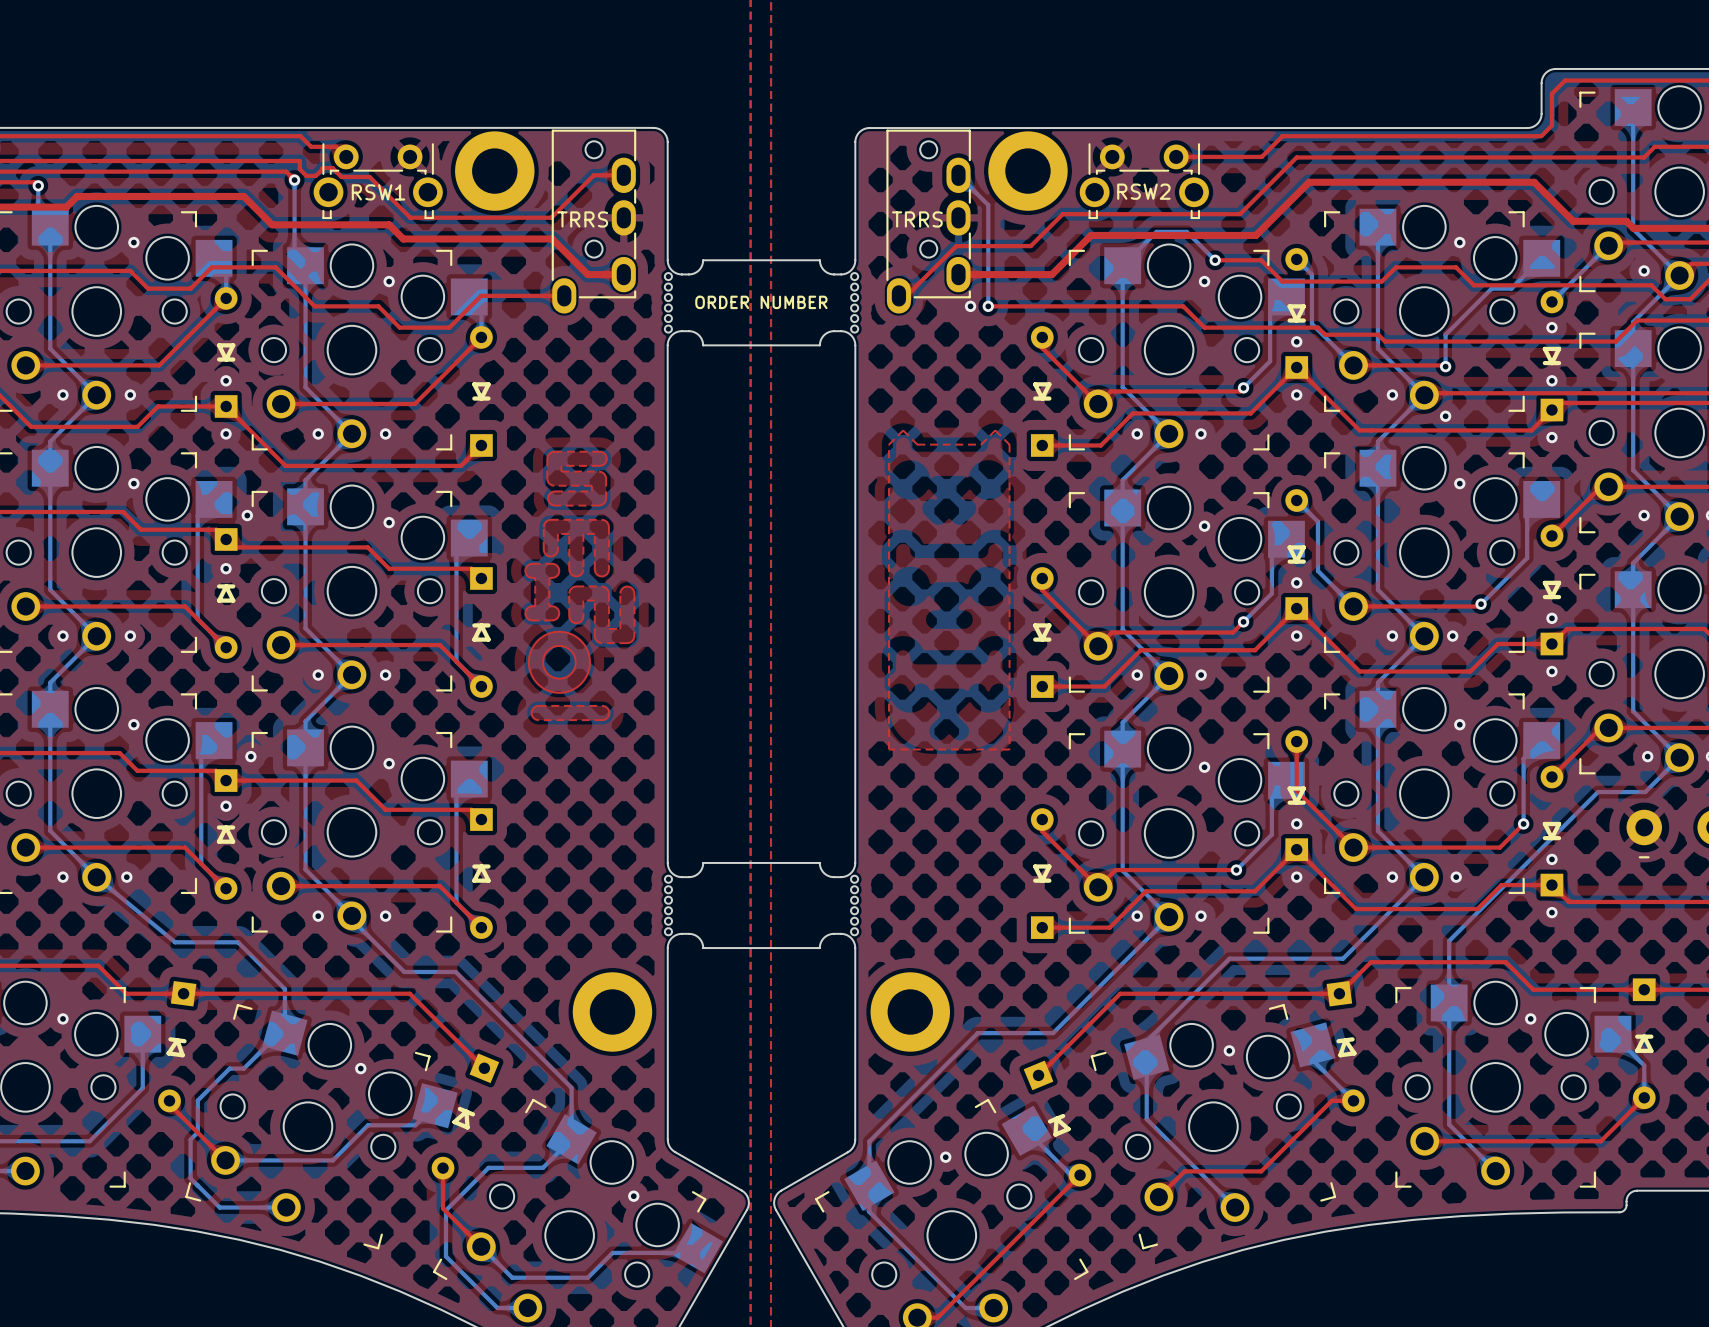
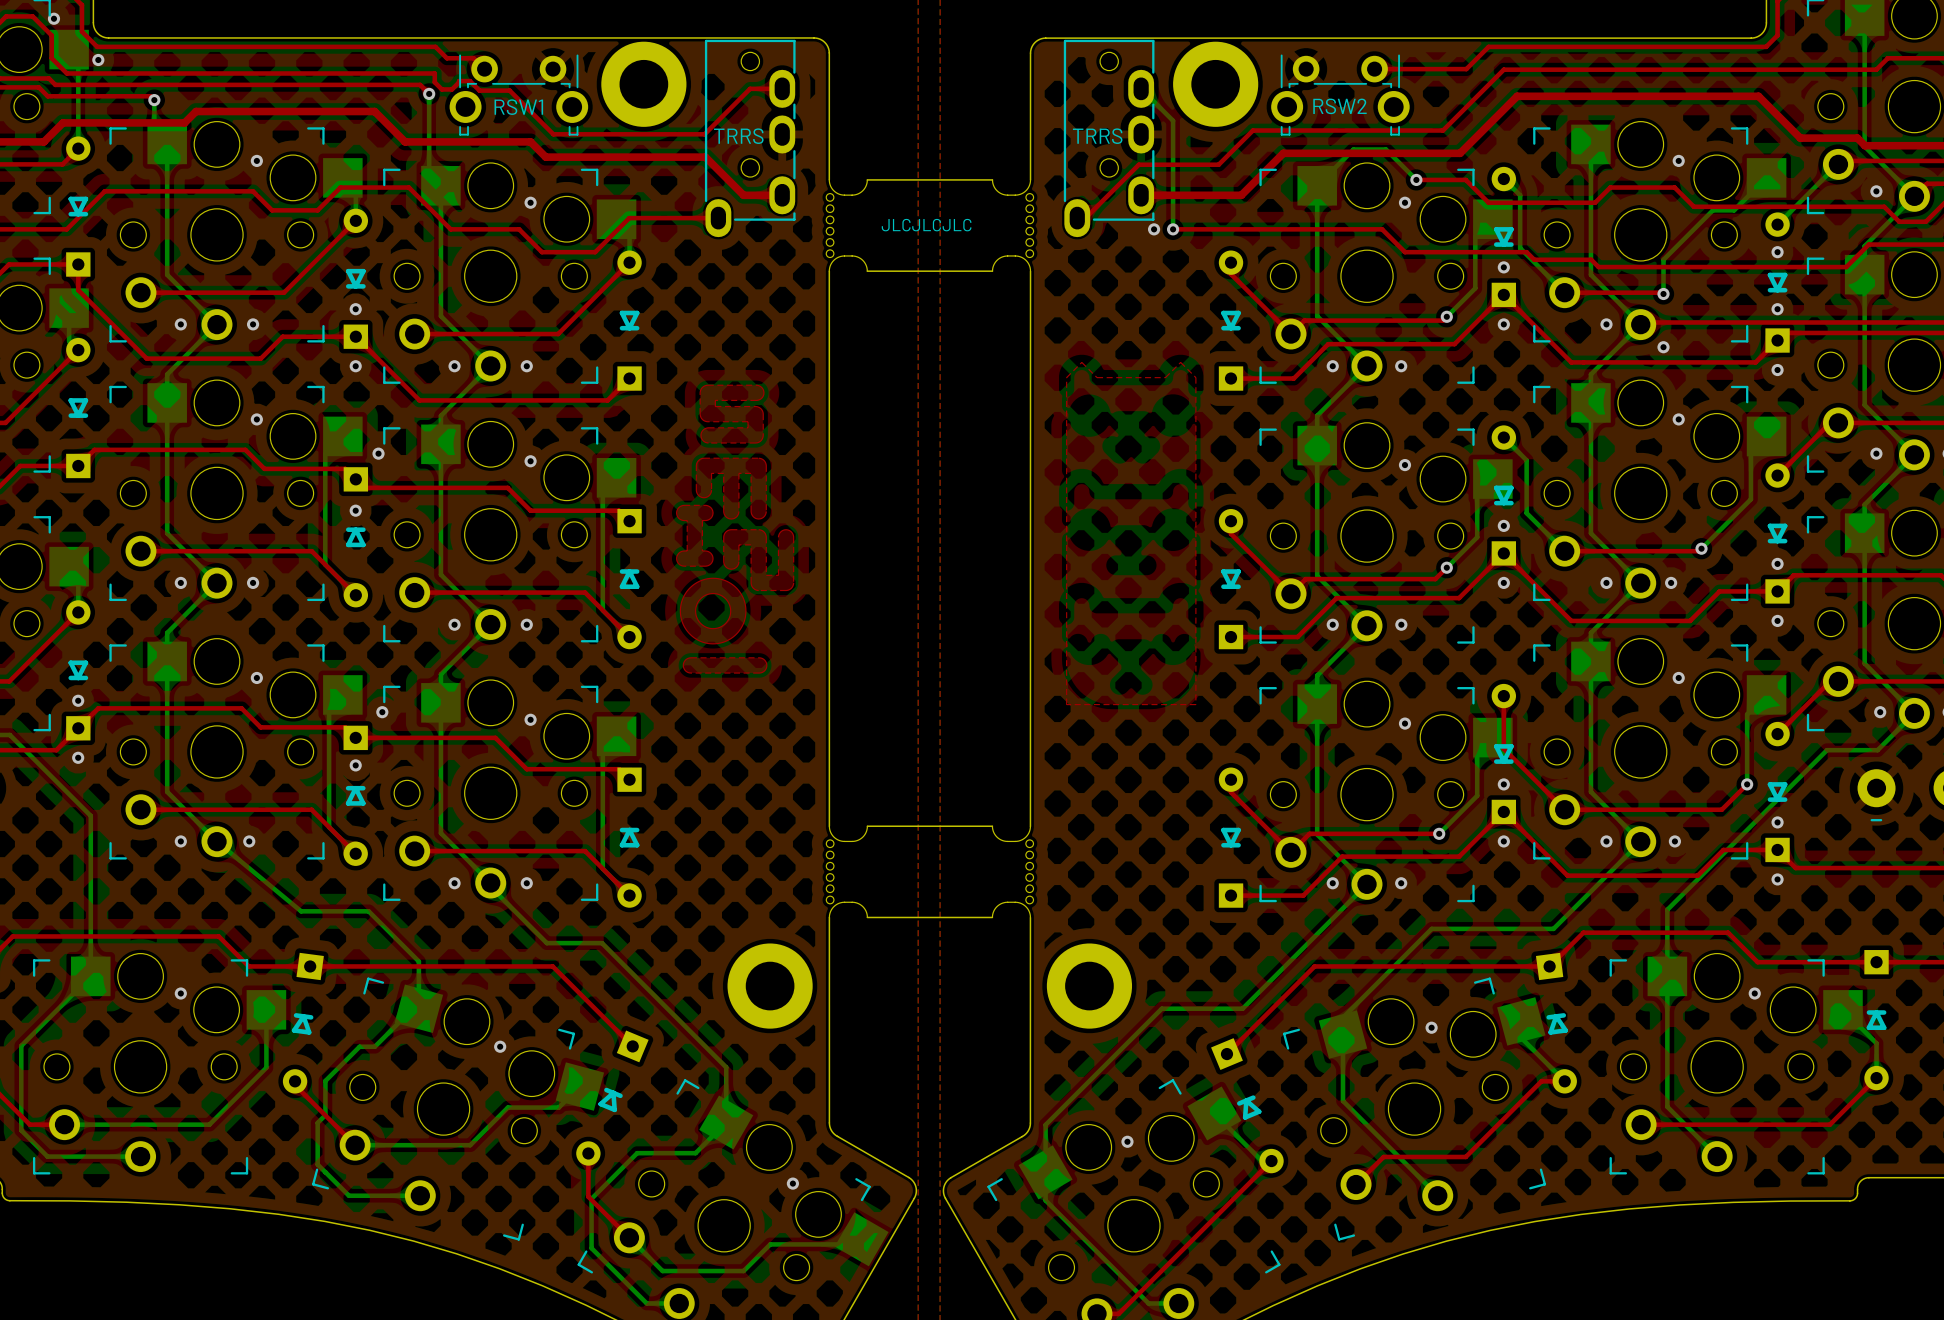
text: ORDER NUMBER (761, 302) -> none
text: none -> JLCJLCJLC (926, 225)

